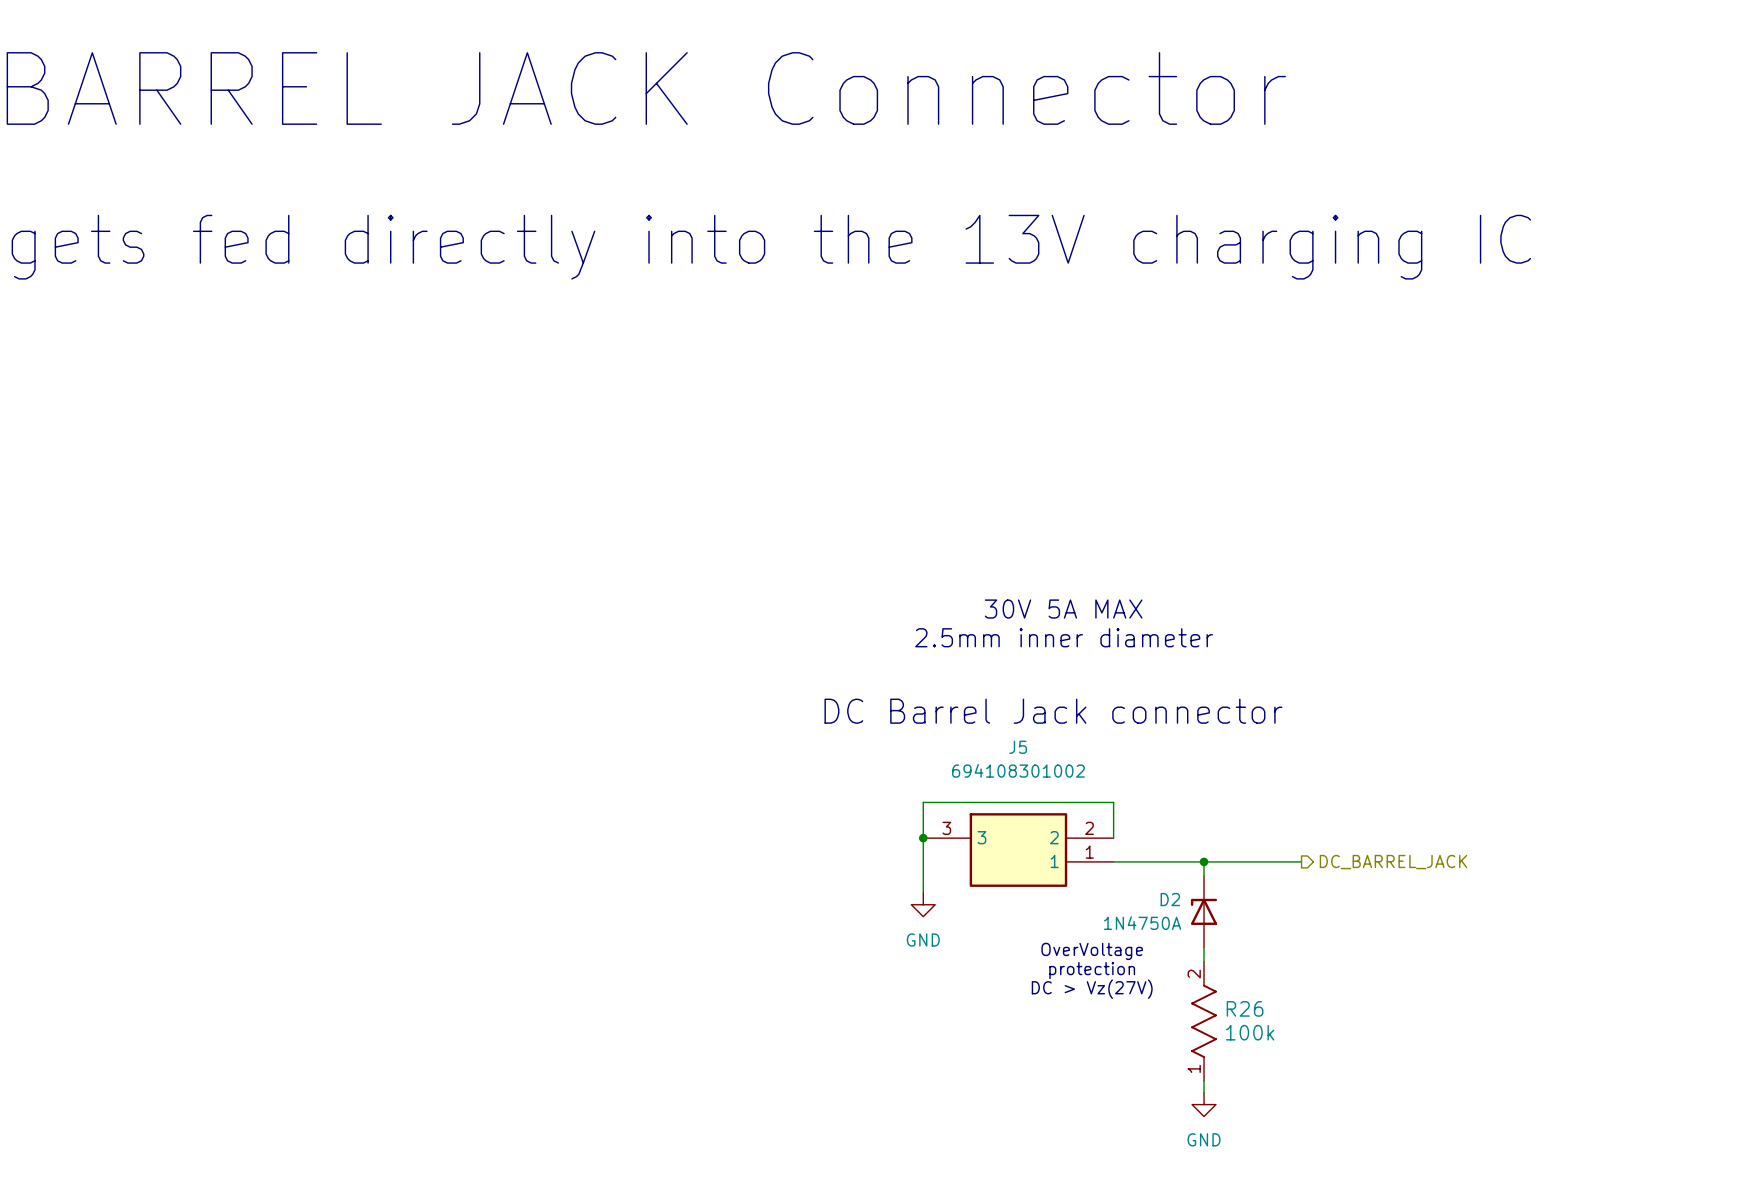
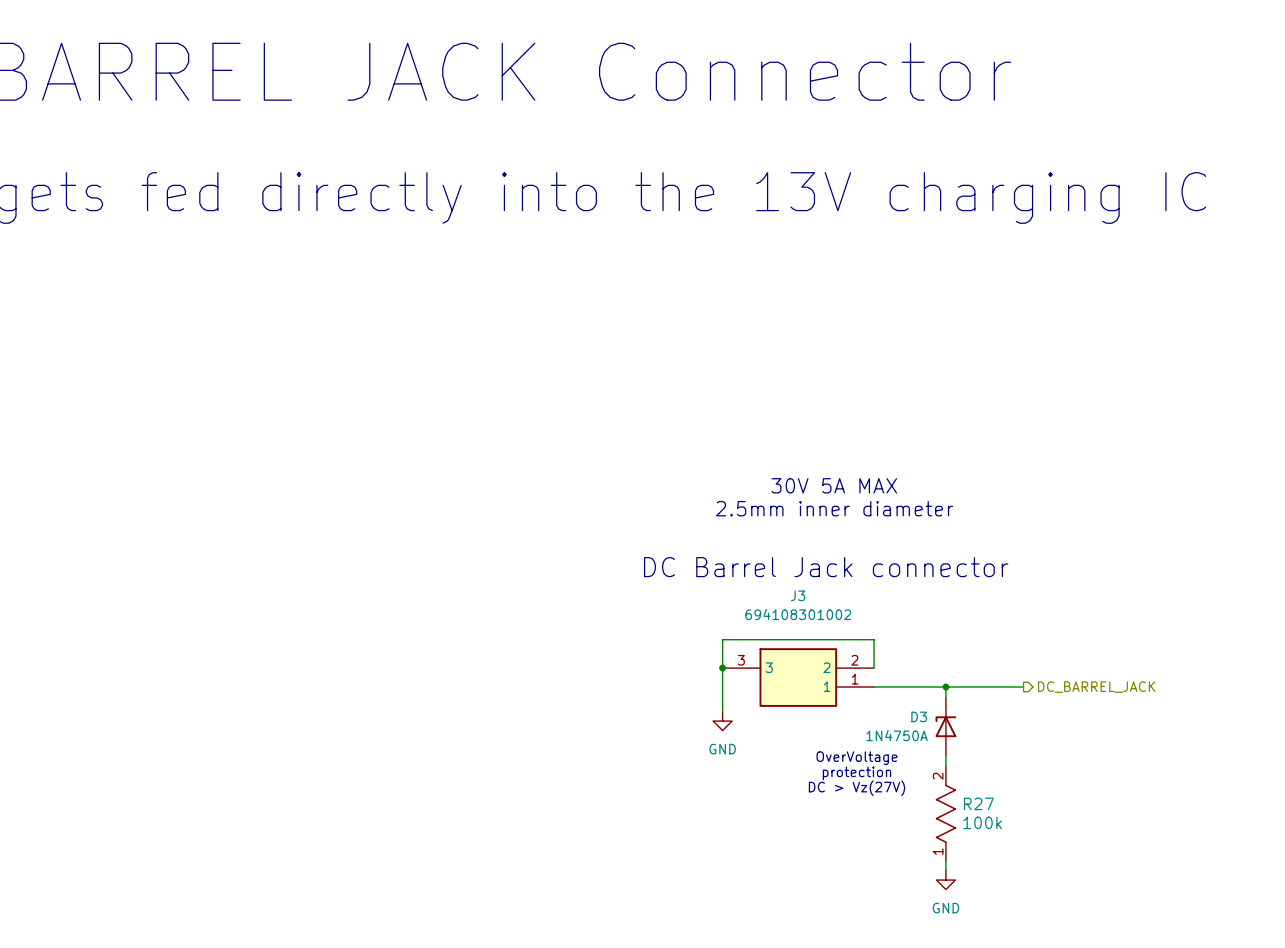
J5 name: J5 (1018, 747) -> J3 (798, 595)
D2 name: D2 (1170, 899) -> D3 (919, 716)
R26 name: R26 (1245, 1008) -> R27 (978, 803)

